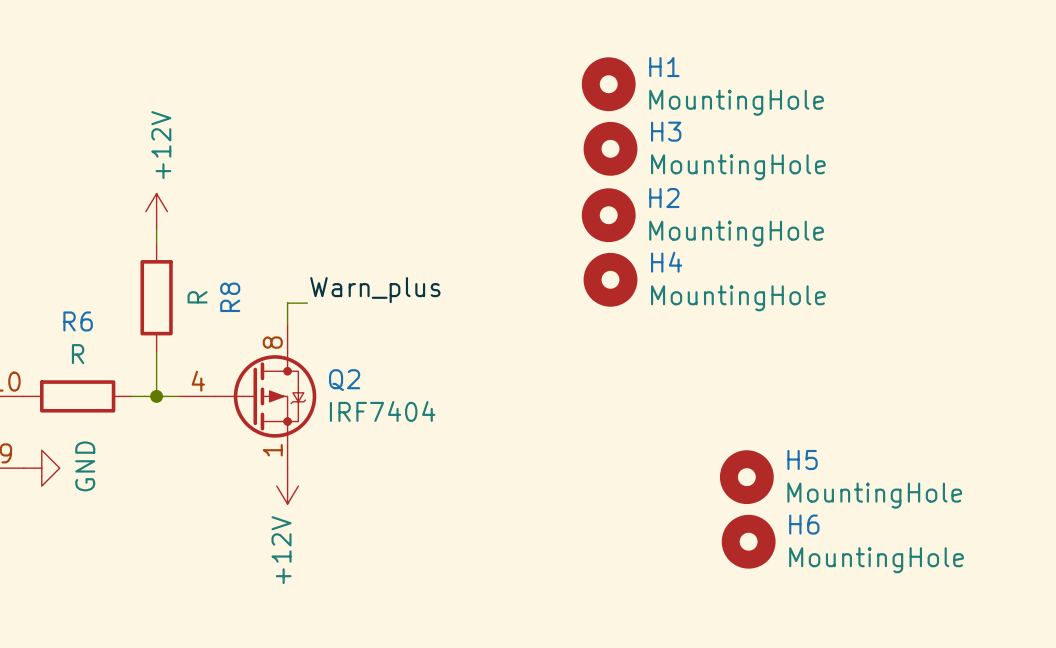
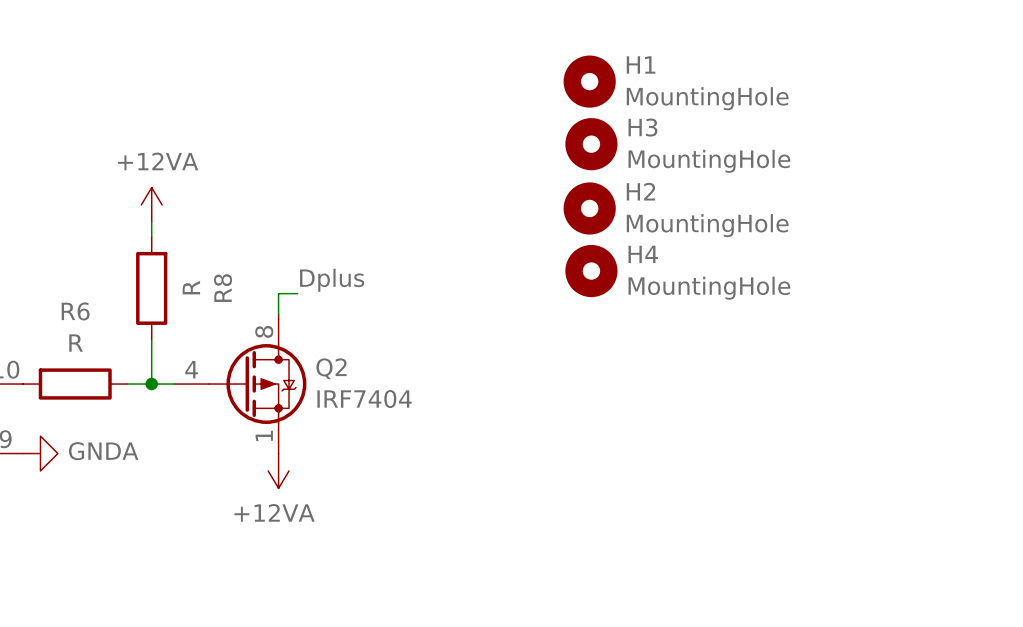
power symbol: +12V (156, 211) -> +12VA (151, 205)
label: Warn_plus (375, 290) -> Dplus (332, 280)
power symbol: GND (41, 468) -> GNDA (40, 453)
H5: MountingHole (746, 477) -> none
power symbol: +12V (287, 486) -> +12VA (278, 470)
H6: MountingHole (748, 541) -> none

